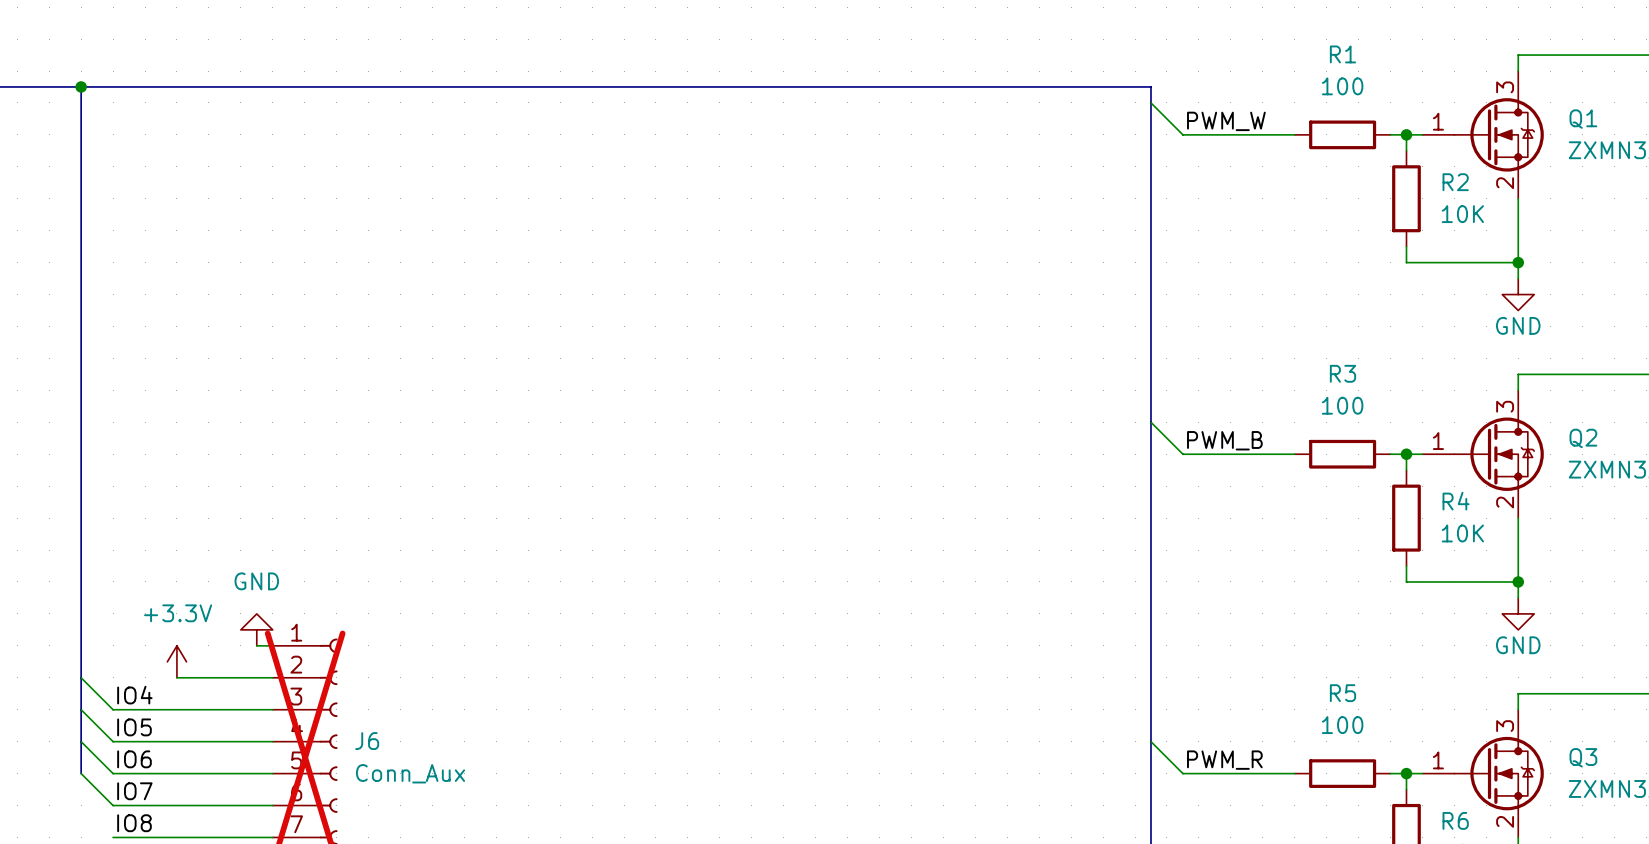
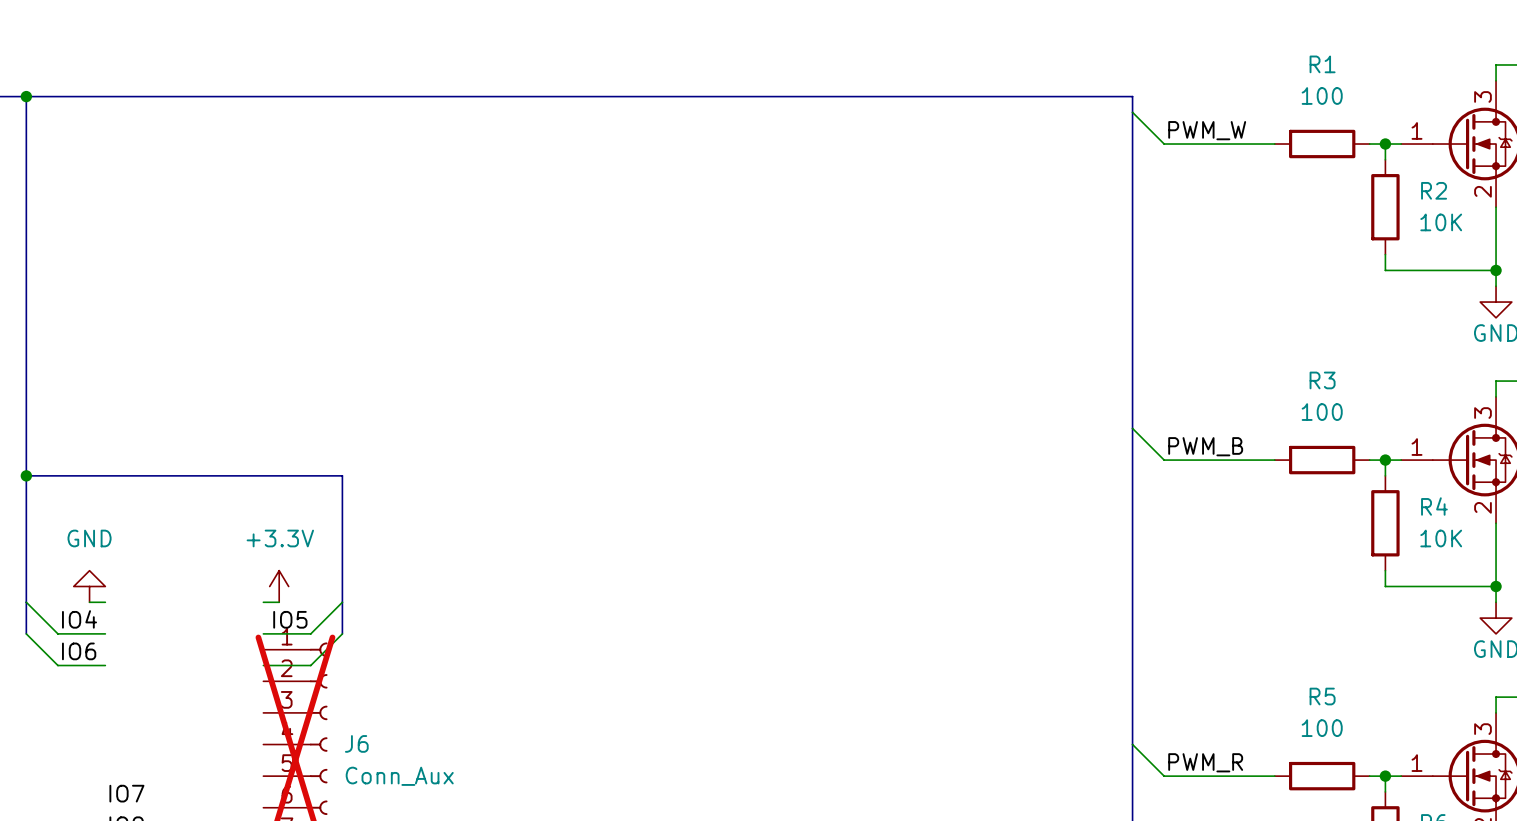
bus: none -> (26, 96) (26, 633)
bus: (81, 86) (81, 773) -> none
junction position: (81, 86) -> (26, 96)
bus: none -> (26, 475) (342, 475) (342, 633)
junction: none -> (26, 475)
wire: none -> (26, 602) (57, 633) (105, 633)
wire: none -> (89, 602) (105, 602)
wire: none -> (342, 602) (310, 633) (263, 633)
wire: none -> (26, 633) (57, 665) (105, 665)
power symbol position: GND (256, 629) -> GND (89, 586)
wire: none -> (342, 633) (310, 665) (263, 665)
wire: (256, 645) (272, 645) -> (263, 602) (279, 602)
power symbol position: +3.3V (176, 661) -> +3.3V (279, 586)
wire: (81, 677) (113, 709) (272, 709) -> none
wire: (176, 677) (272, 677) -> none
label position: IO4 (134, 695) -> IO4 (79, 619)
wire: (81, 709) (113, 741) (272, 741) -> none
label position: IO5 (134, 727) -> IO5 (290, 619)
wire: (81, 741) (113, 773) (272, 773) -> none
label position: IO6 (134, 759) -> IO6 (79, 651)
wire: (81, 773) (113, 805) (272, 805) -> none

